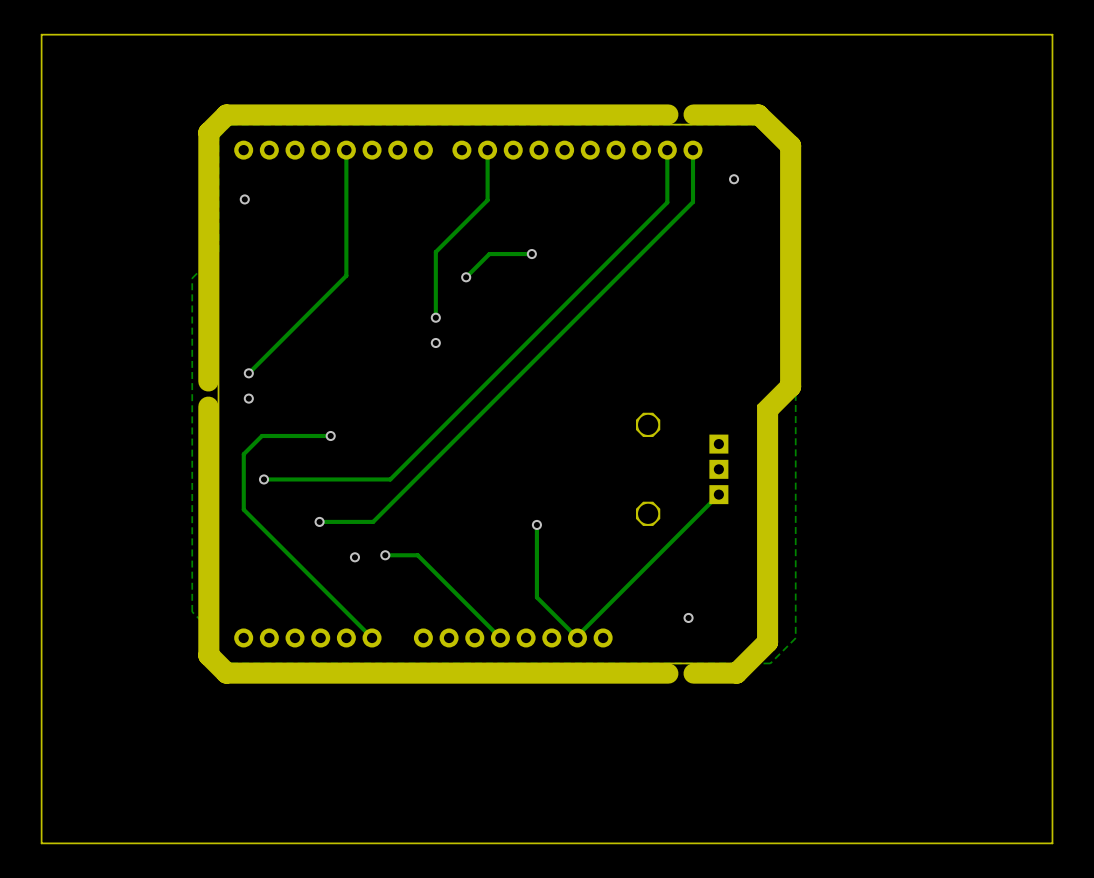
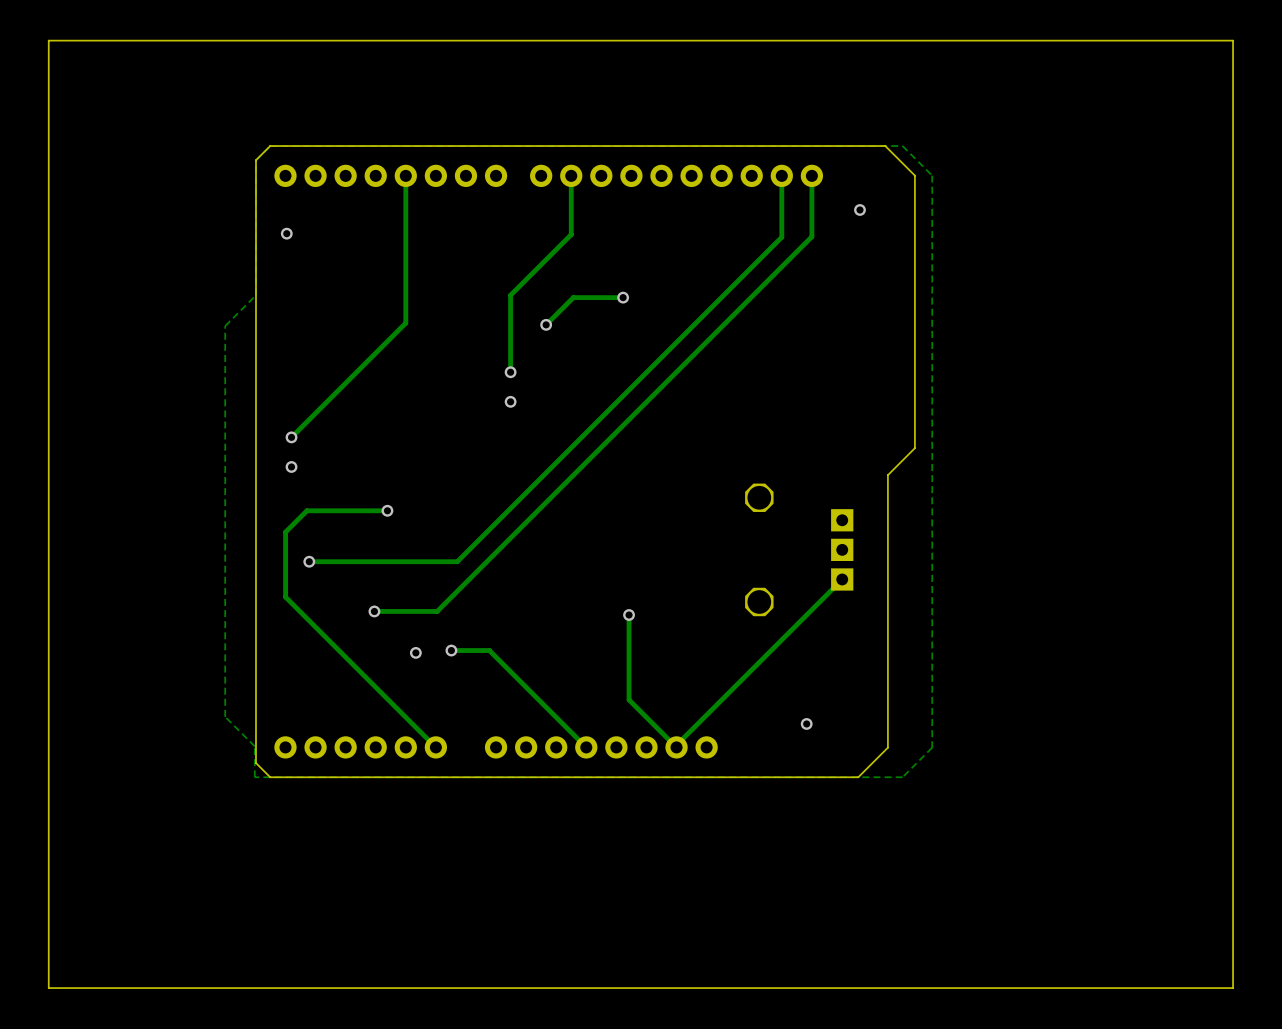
board edge: (668, 114) (226, 114) (208, 132) (208, 381) -> none
board edge: (693, 114) (758, 114) (791, 145) (791, 386) (768, 409) (768, 642) (736, 673) (693, 673) -> none
board edge: (208, 406) (208, 655) (226, 673) (668, 673) -> none

